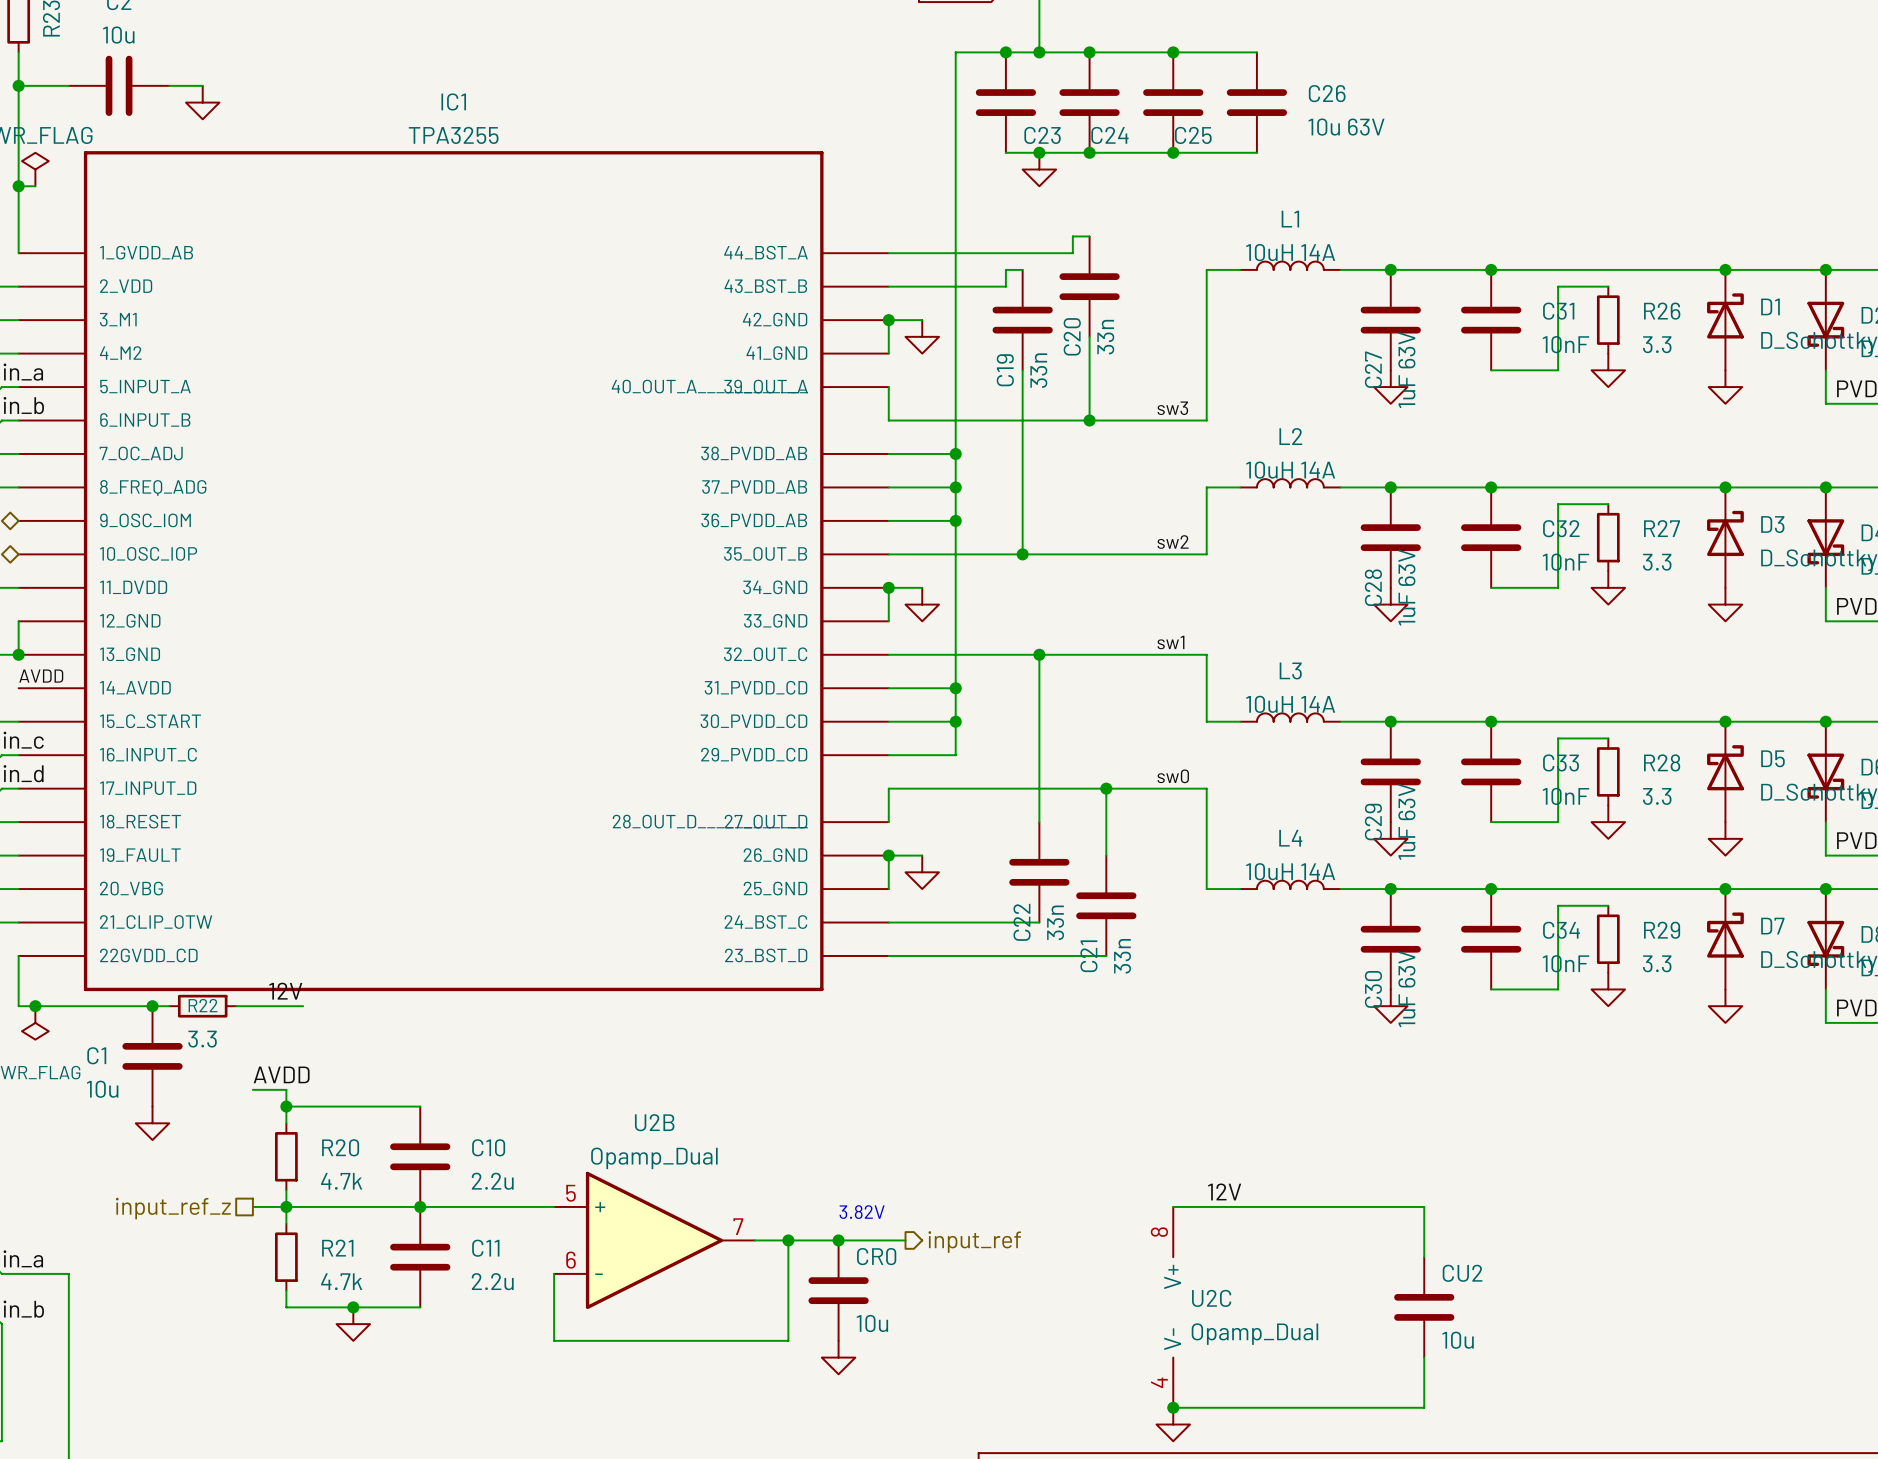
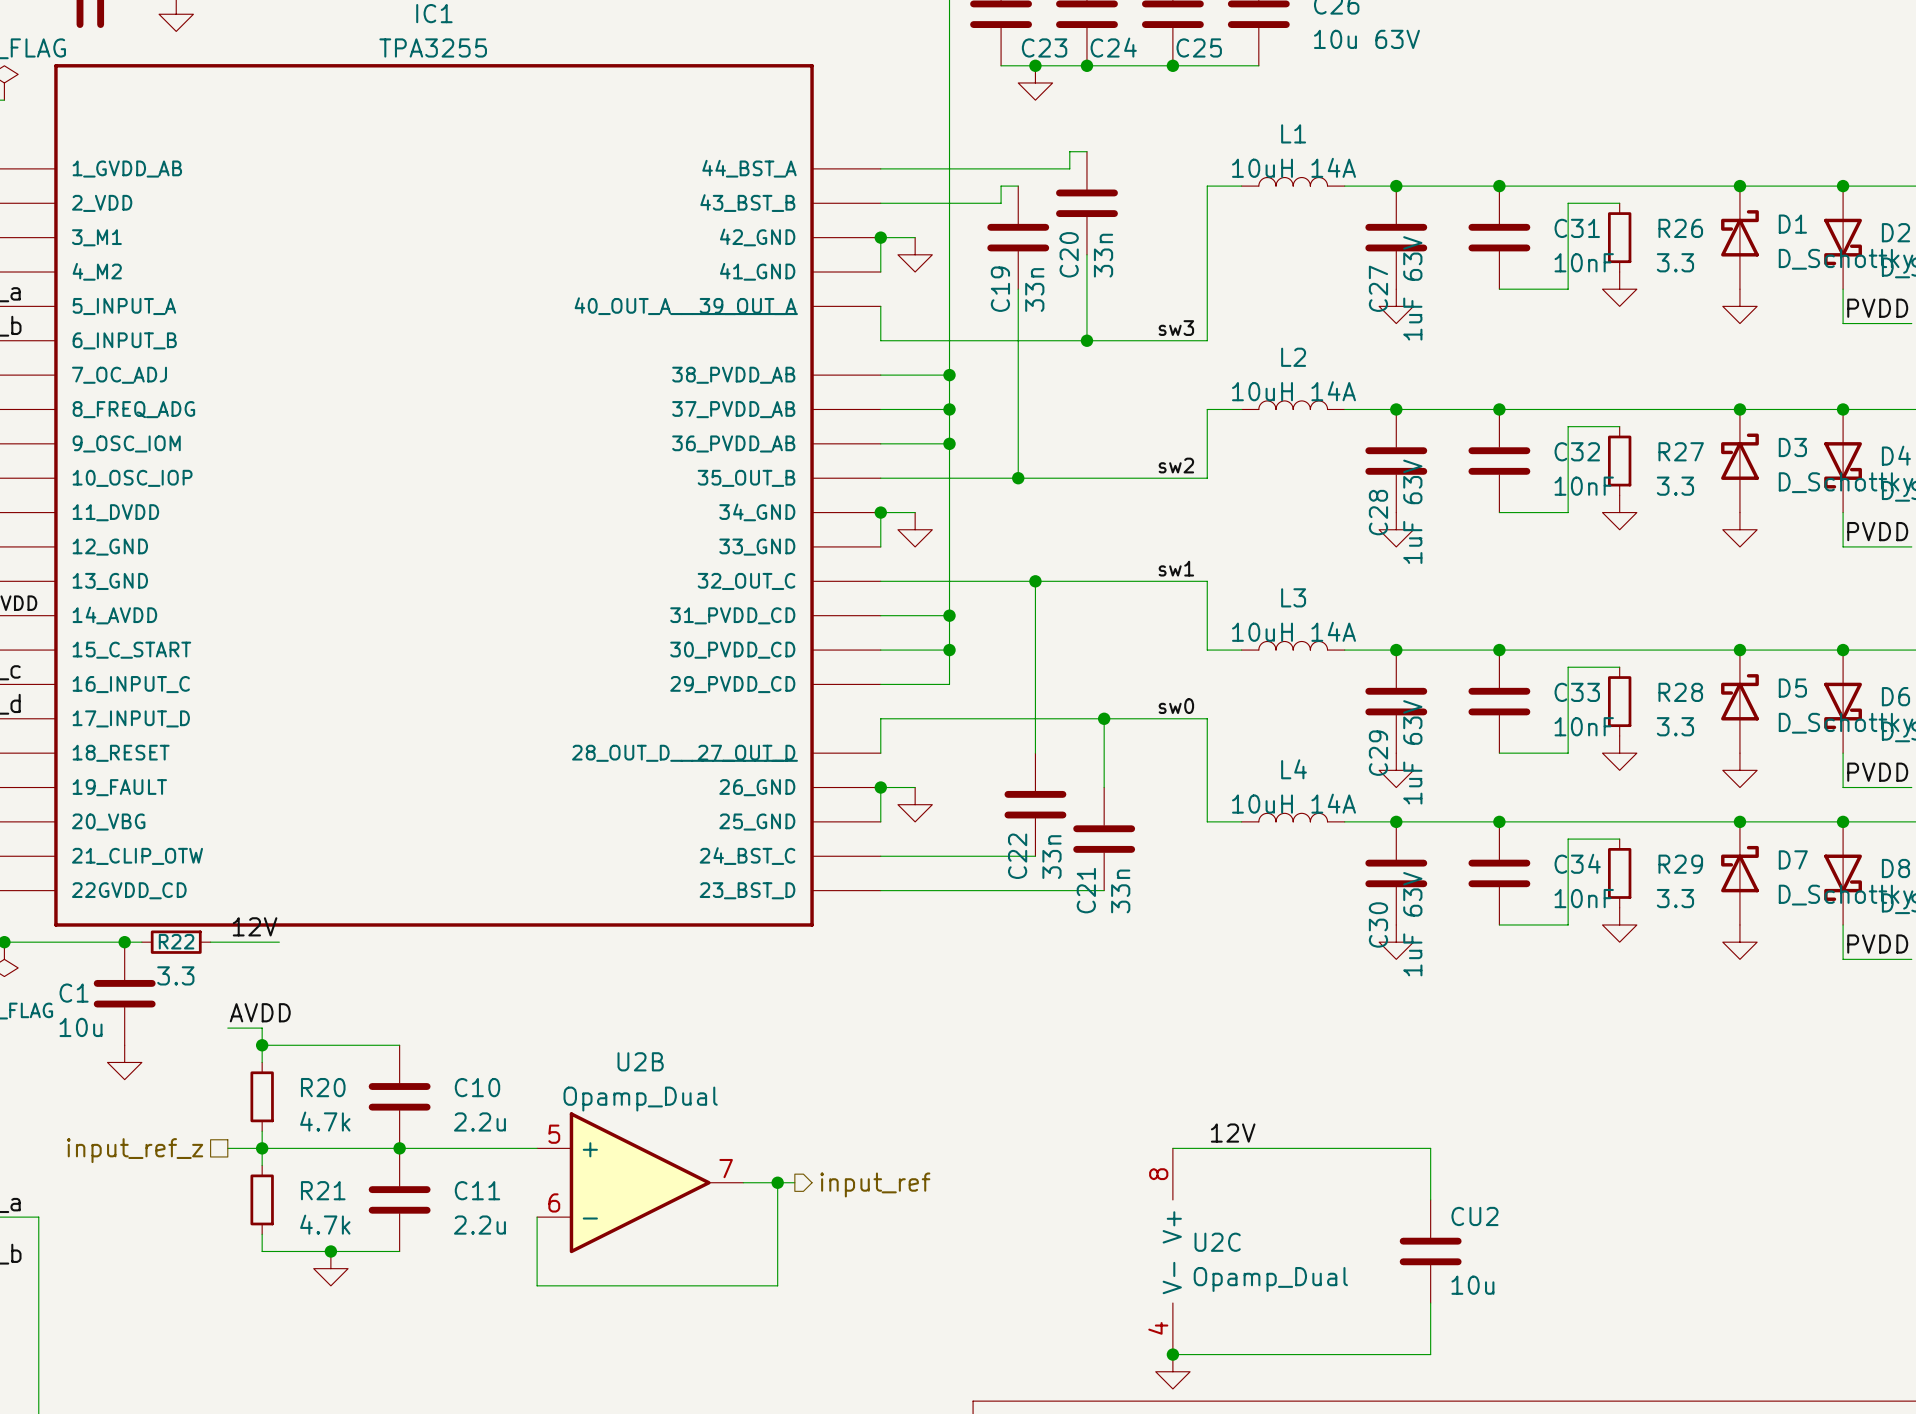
text: 3.82V (862, 1212) -> none
wire: (805, 1240) (905, 1240) -> none
junction: (838, 1240) -> none
hierarchical label position: input_ref (974, 1242) -> input_ref (875, 1184)
CR0: 10u (838, 1290) -> none
power symbol: (838, 1357) -> none

